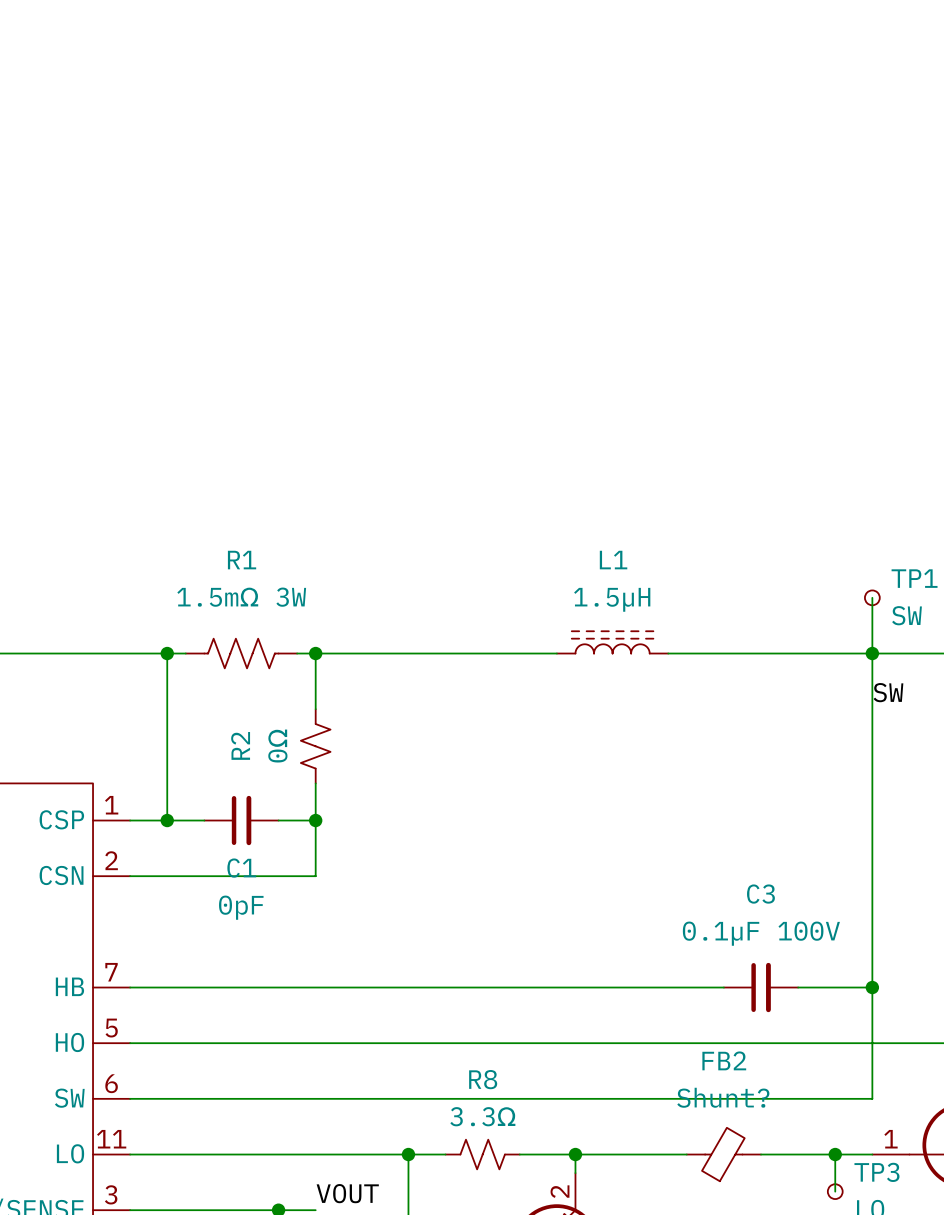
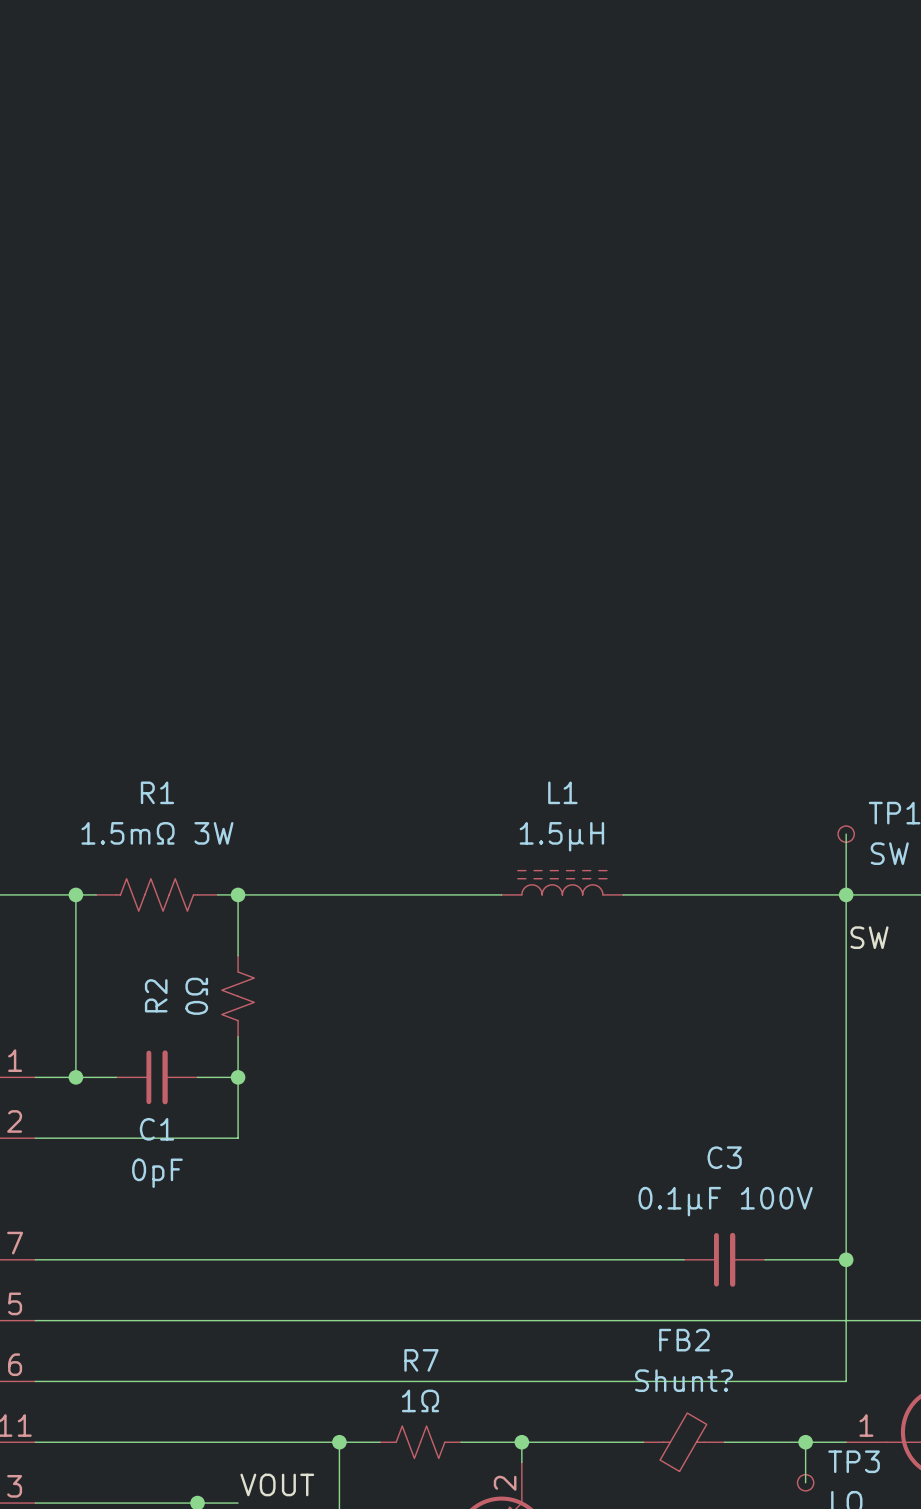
R8 name: R8 (483, 1079) -> R7 (421, 1360)
R8 value: 3.3Ω (482, 1116) -> 1Ω (420, 1400)

